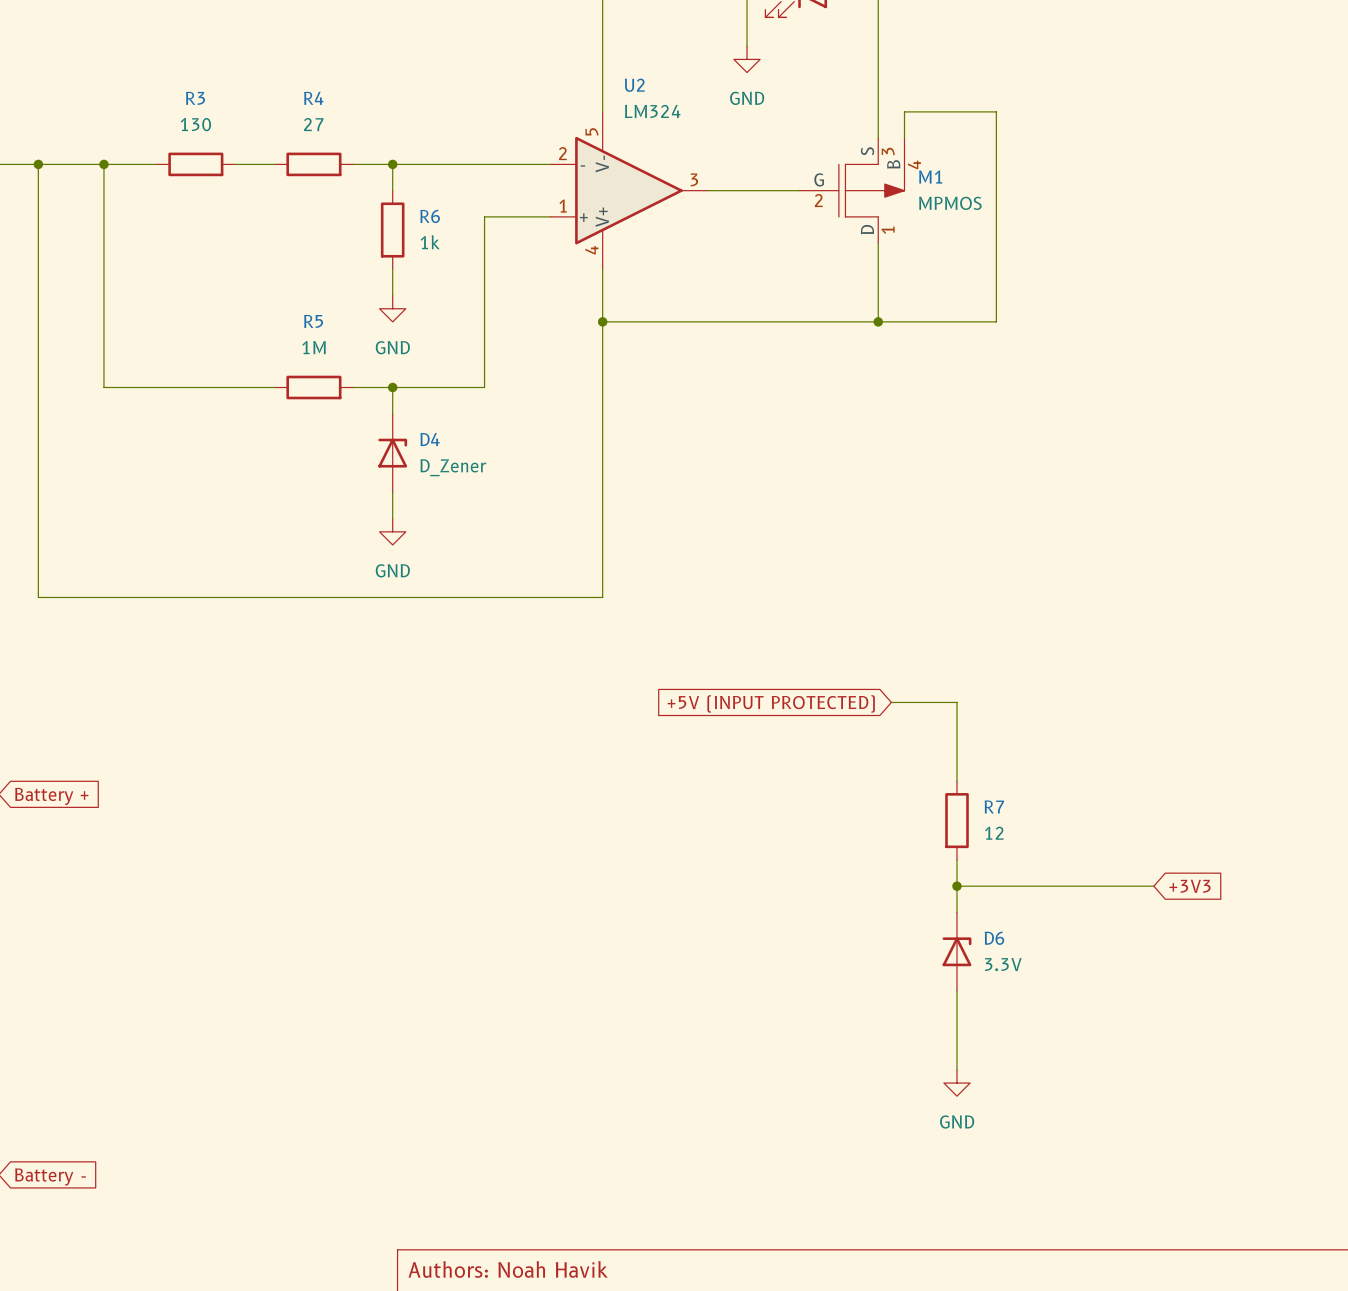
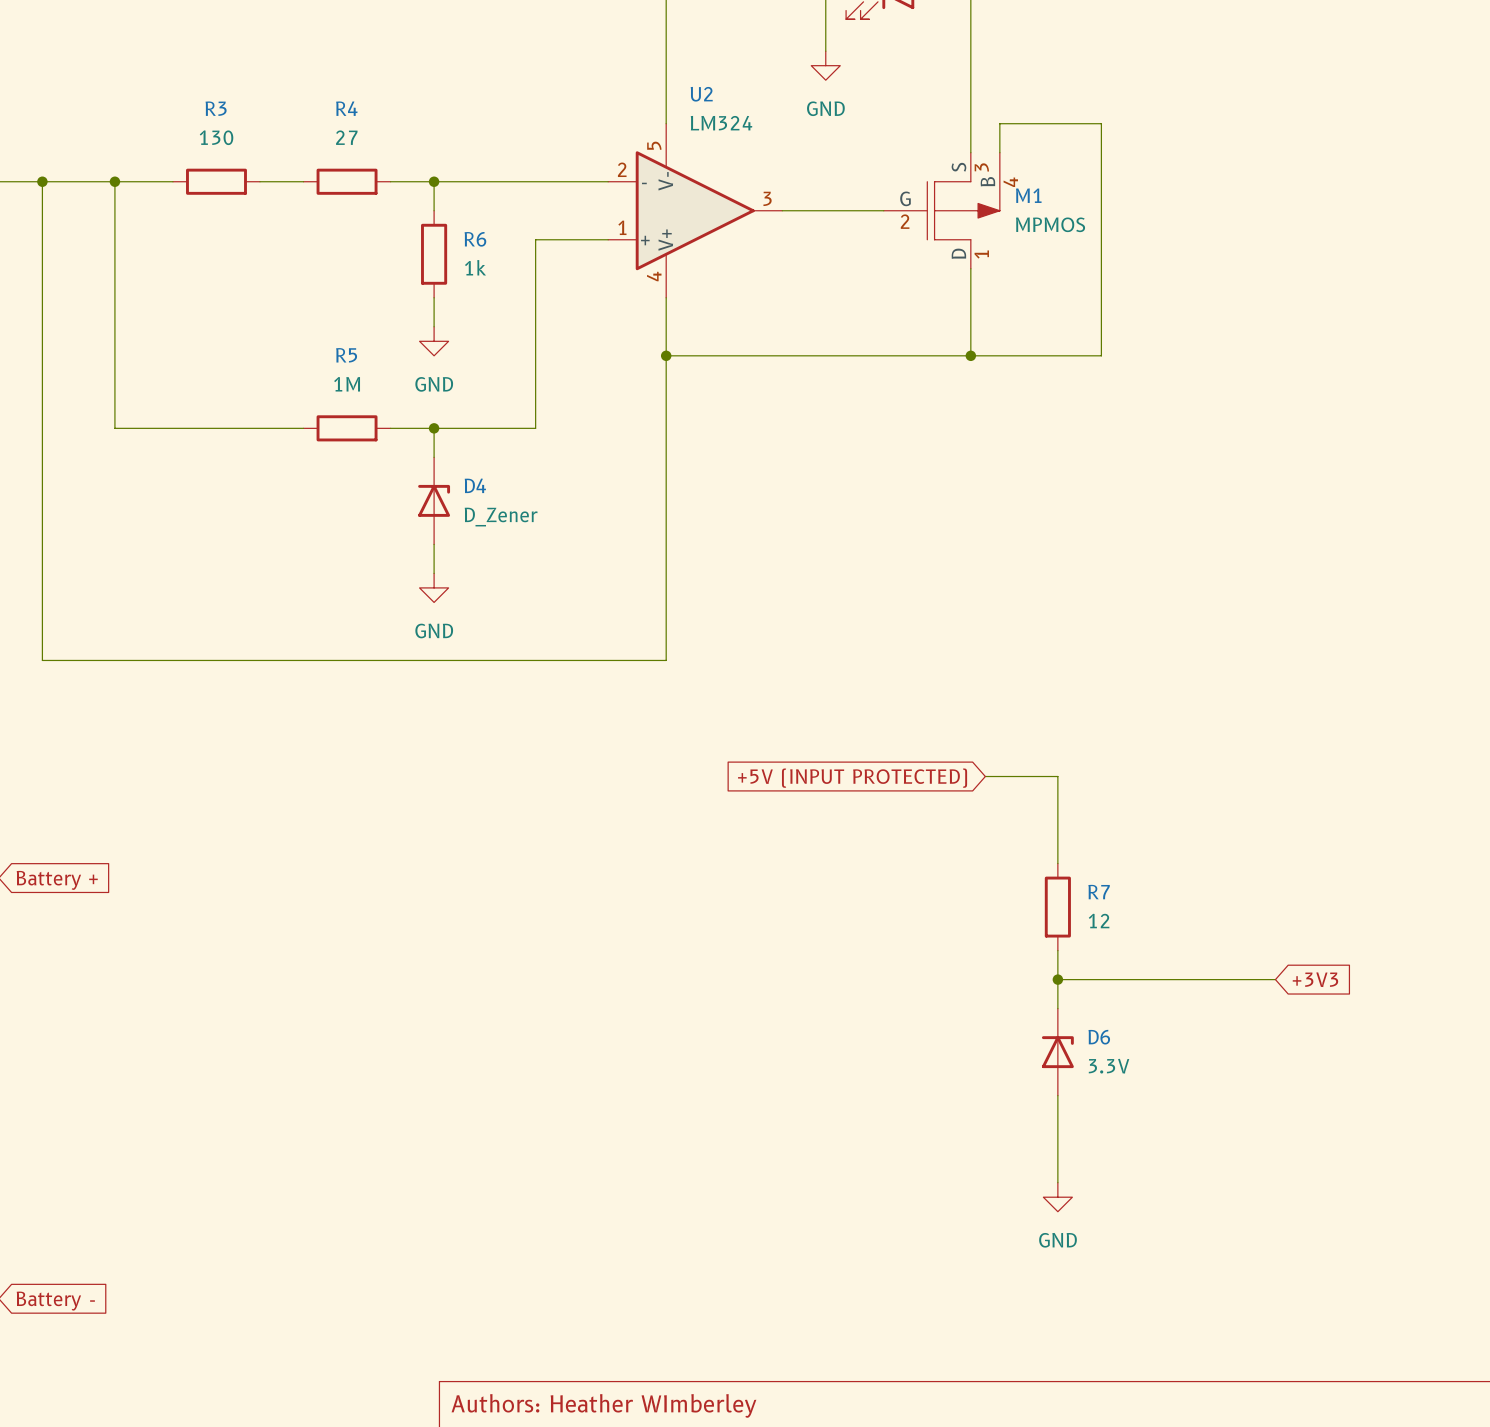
title block: Authors: Noah Havik (508, 1269) -> Authors: Heather WImberley (603, 1405)

